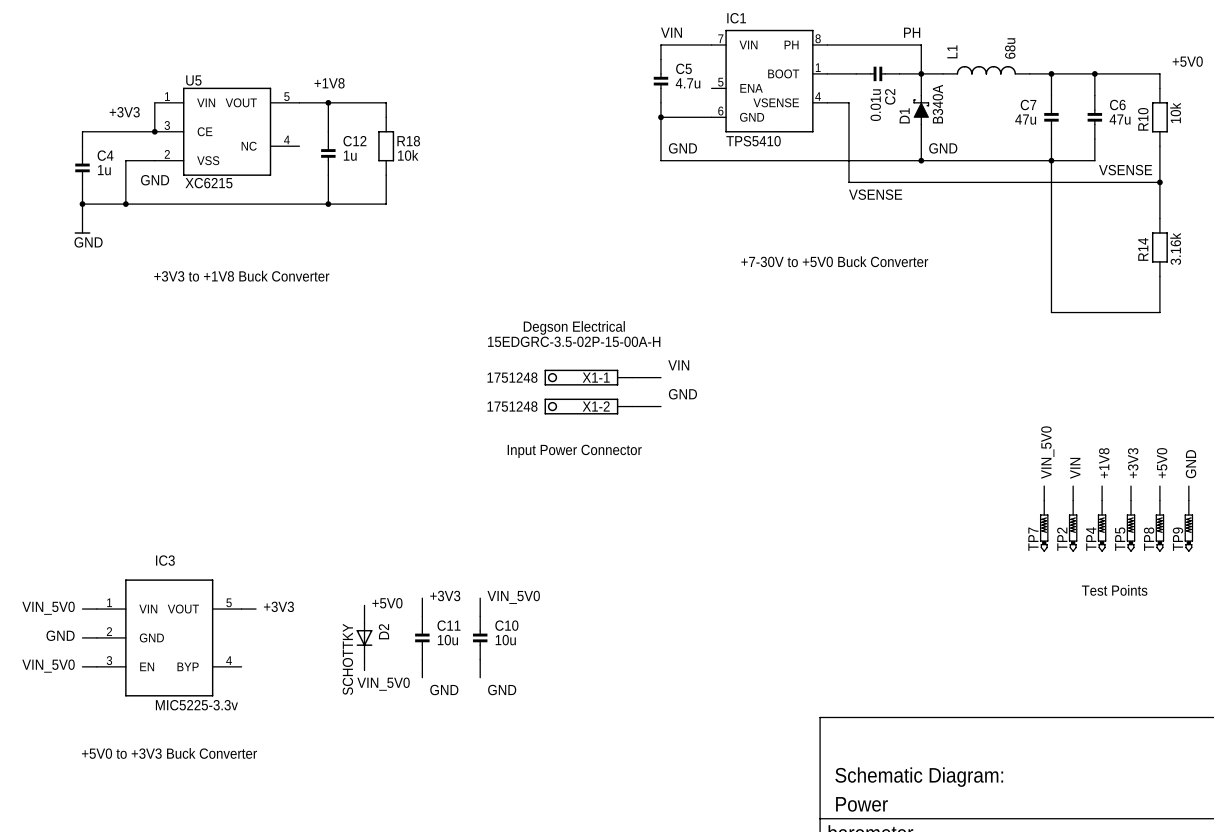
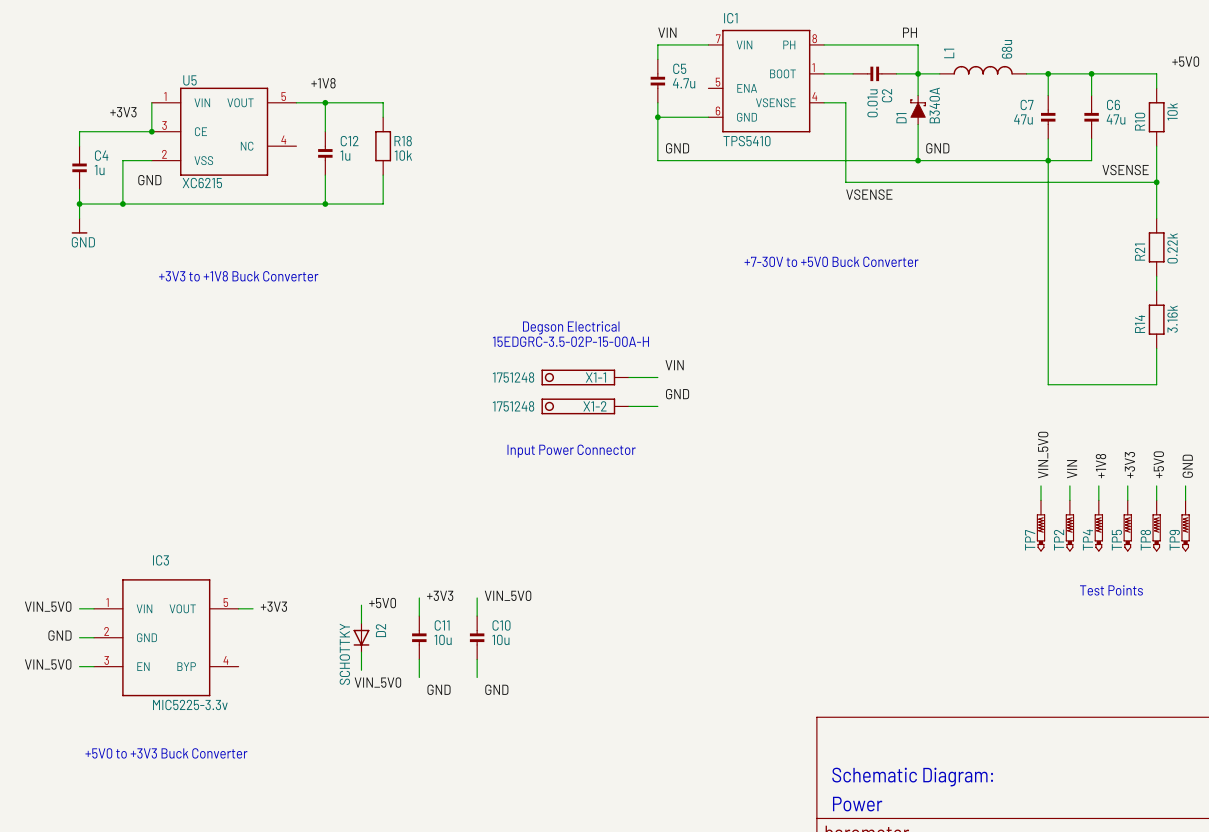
R14 value: 3.16k (1175, 248) -> 0.22k (1172, 248)
R14 name: R14 (1143, 249) -> R21 (1139, 252)
wire: (1159, 290) (1159, 312) (1051, 312) -> (1156, 348) (1156, 384) (1048, 384) (1048, 312)
R14: none -> 3.16k (1156, 319)

